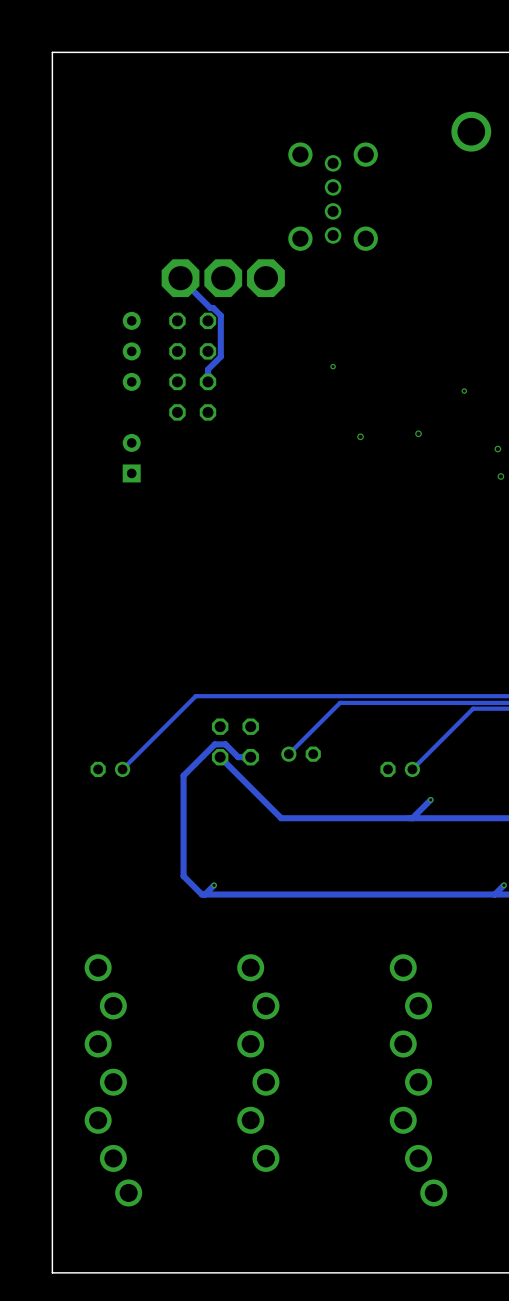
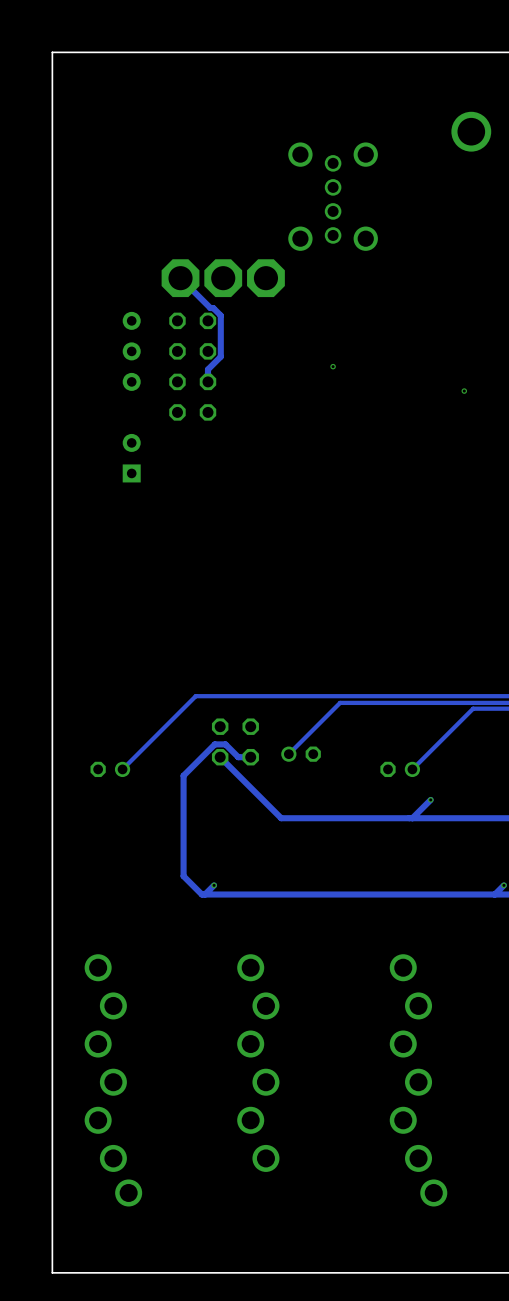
via: (418, 433) -> none
via: (360, 436) -> none
via: (497, 449) -> none
via: (500, 476) -> none

